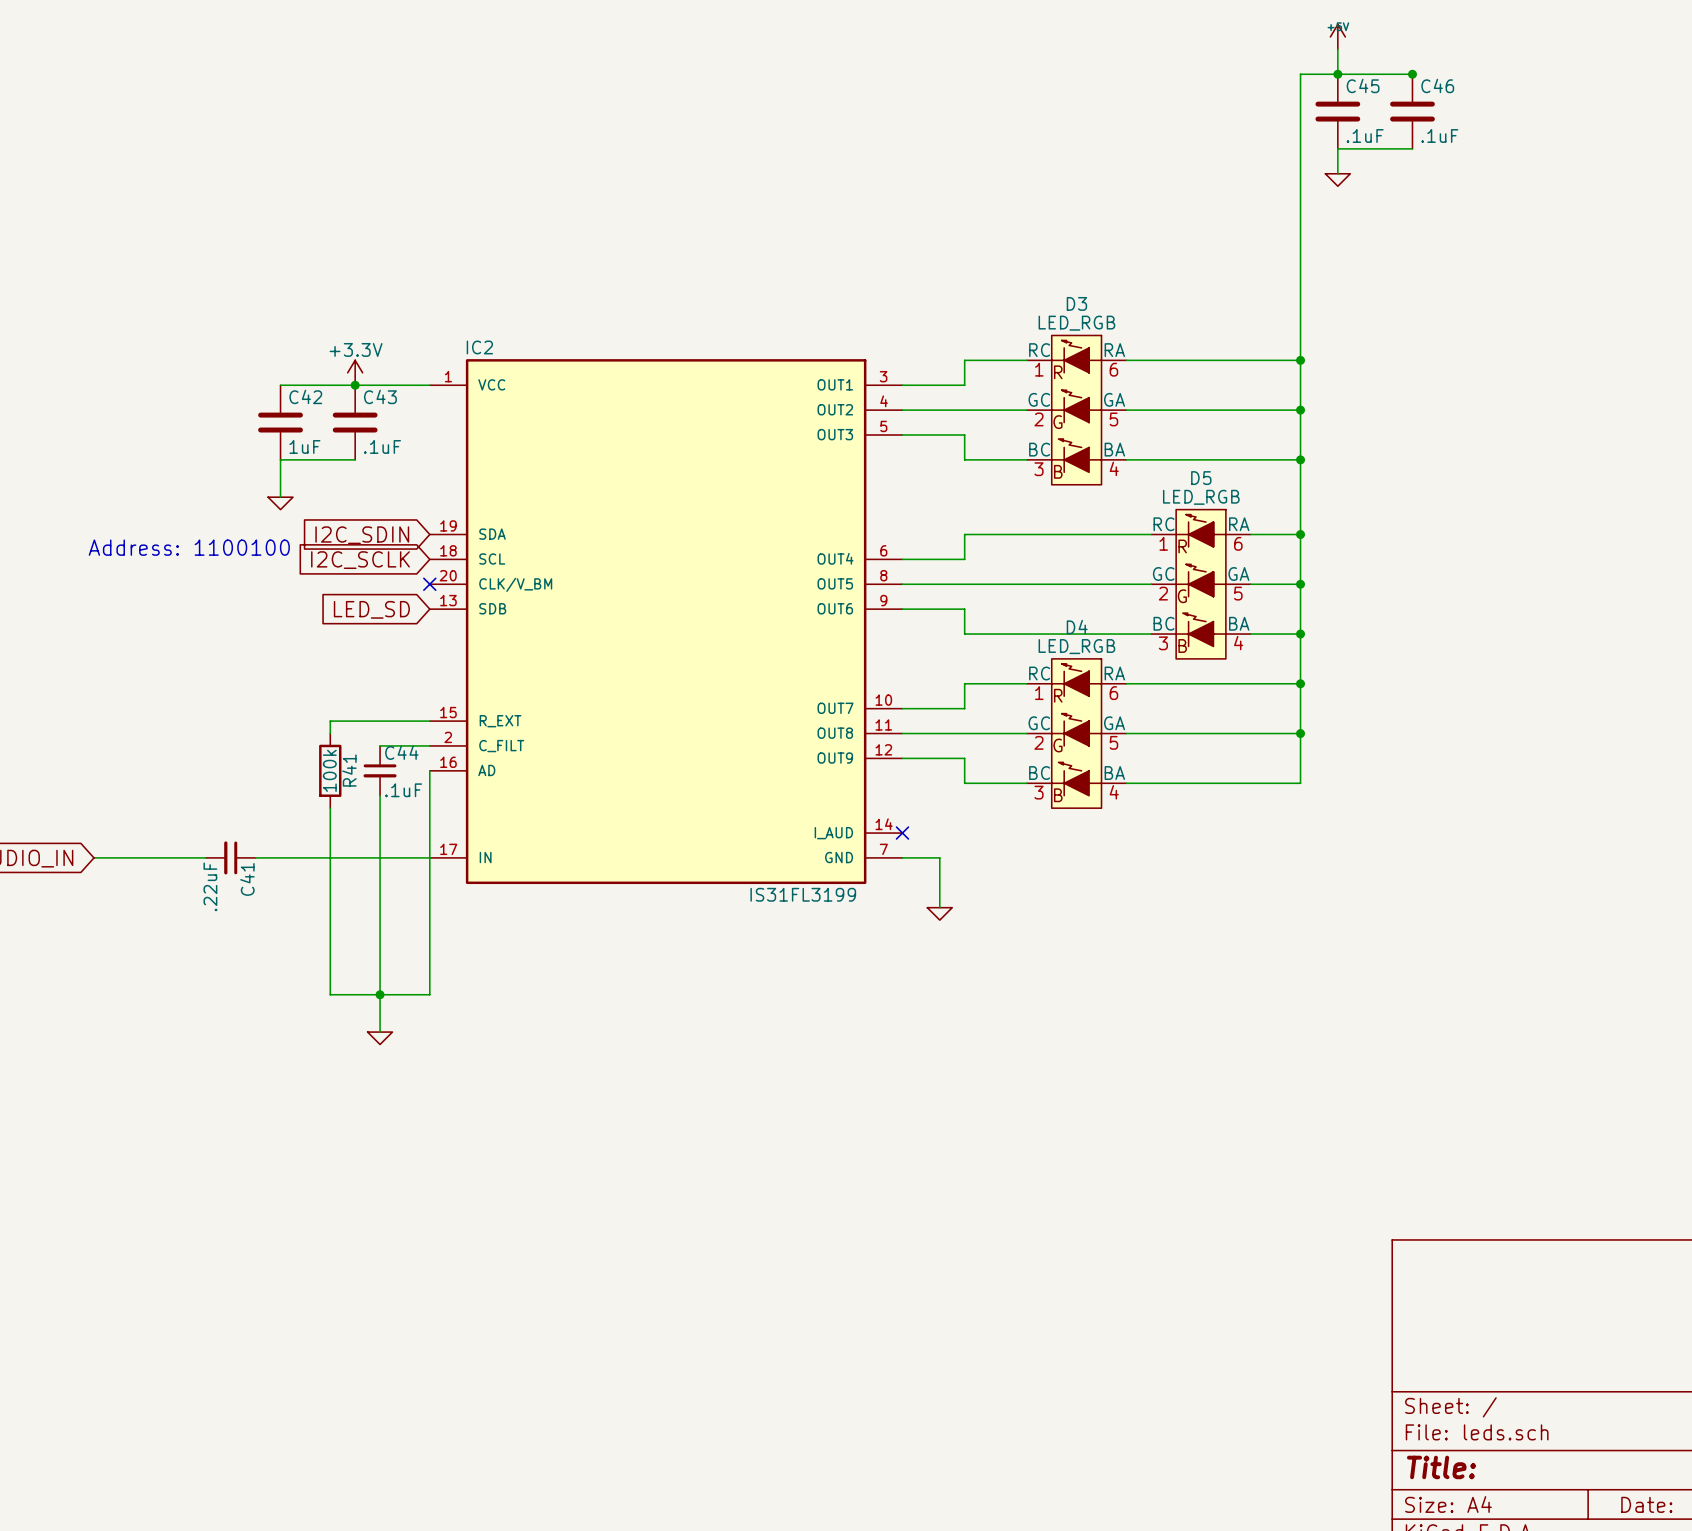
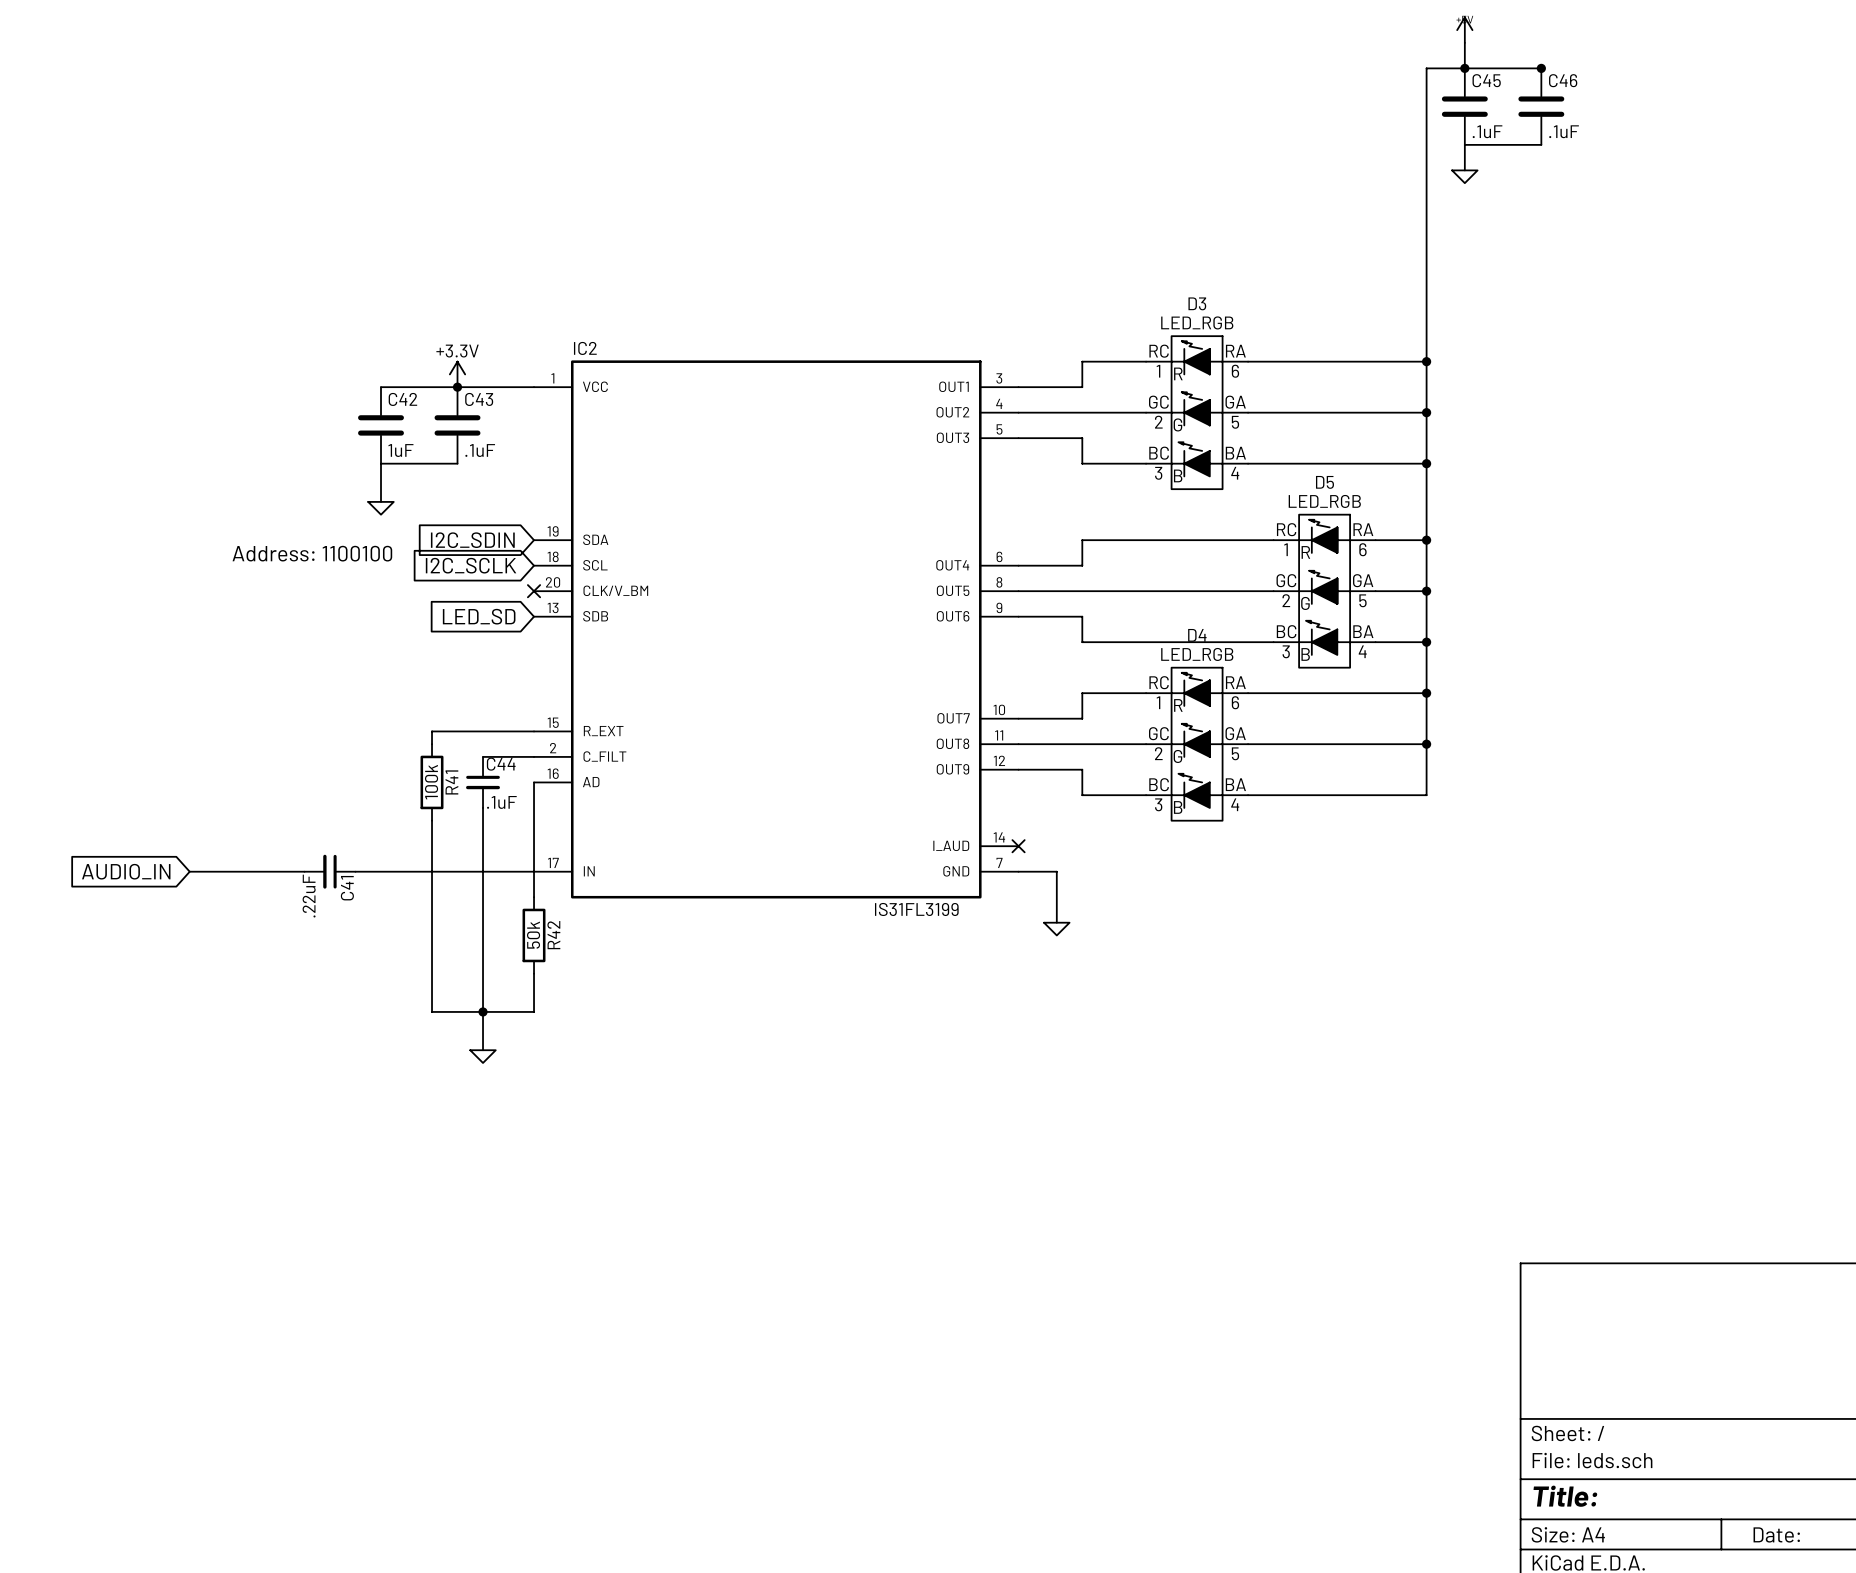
wire: (429, 882) (429, 957) -> none
R42: none -> 50k (534, 935)

